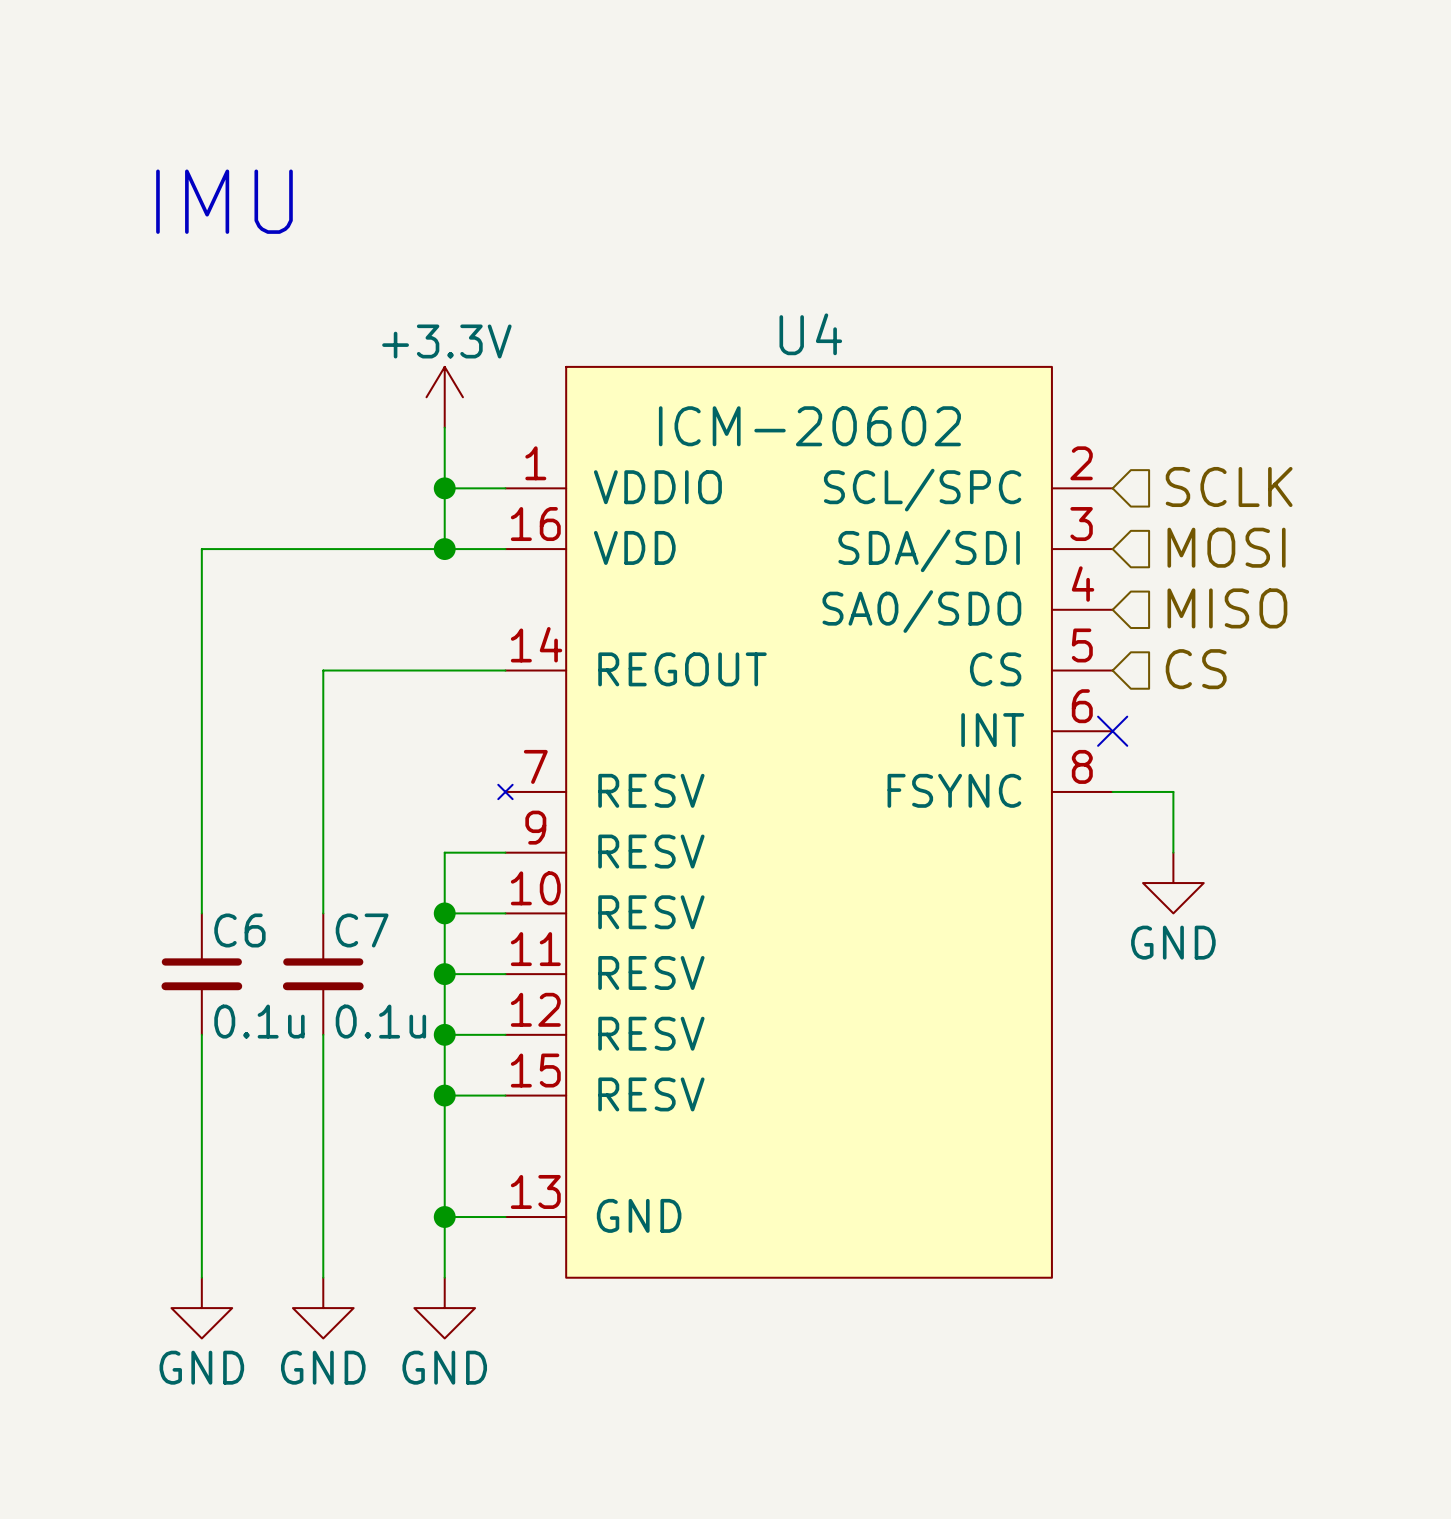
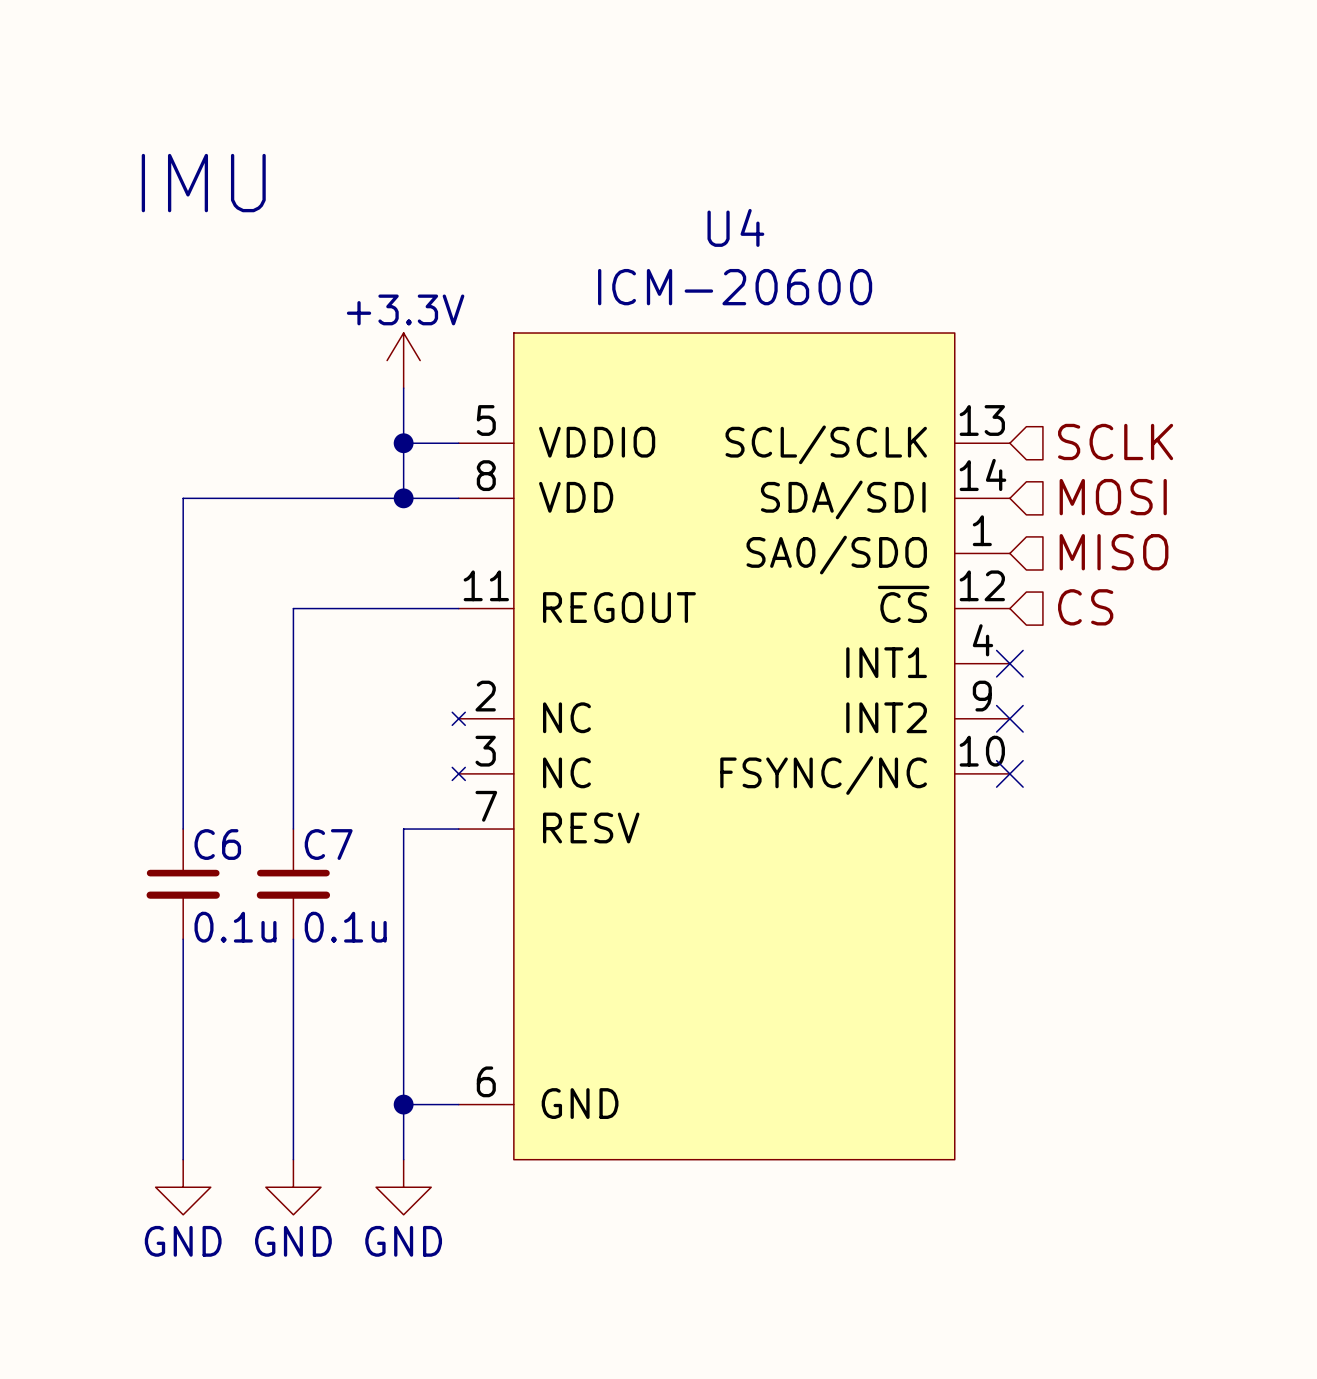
U4 name position: U4 (810, 334) -> U4 (735, 227)
U4 symbol: [498, 366, 1113, 1278] -> [452, 333, 1010, 1160]
U4 value: ICM-20602 (809, 426) -> ICM-20600 (735, 287)
wire: (1112, 791) (1173, 791) (1173, 852) -> none
no-connect mark: none -> (1009, 718)
wire: (505, 852) (444, 852) (444, 913) -> none
no-connect mark: none -> (1009, 773)
power symbol: GND (1173, 883) -> none
junction: (444, 913) -> none
wire: (444, 974) (505, 974) -> none
junction: (444, 974) -> none
wire: (444, 1034) (505, 1034) -> none
junction: (444, 1034) -> none
wire: (444, 1095) (505, 1095) -> none
junction: (444, 1095) -> none

